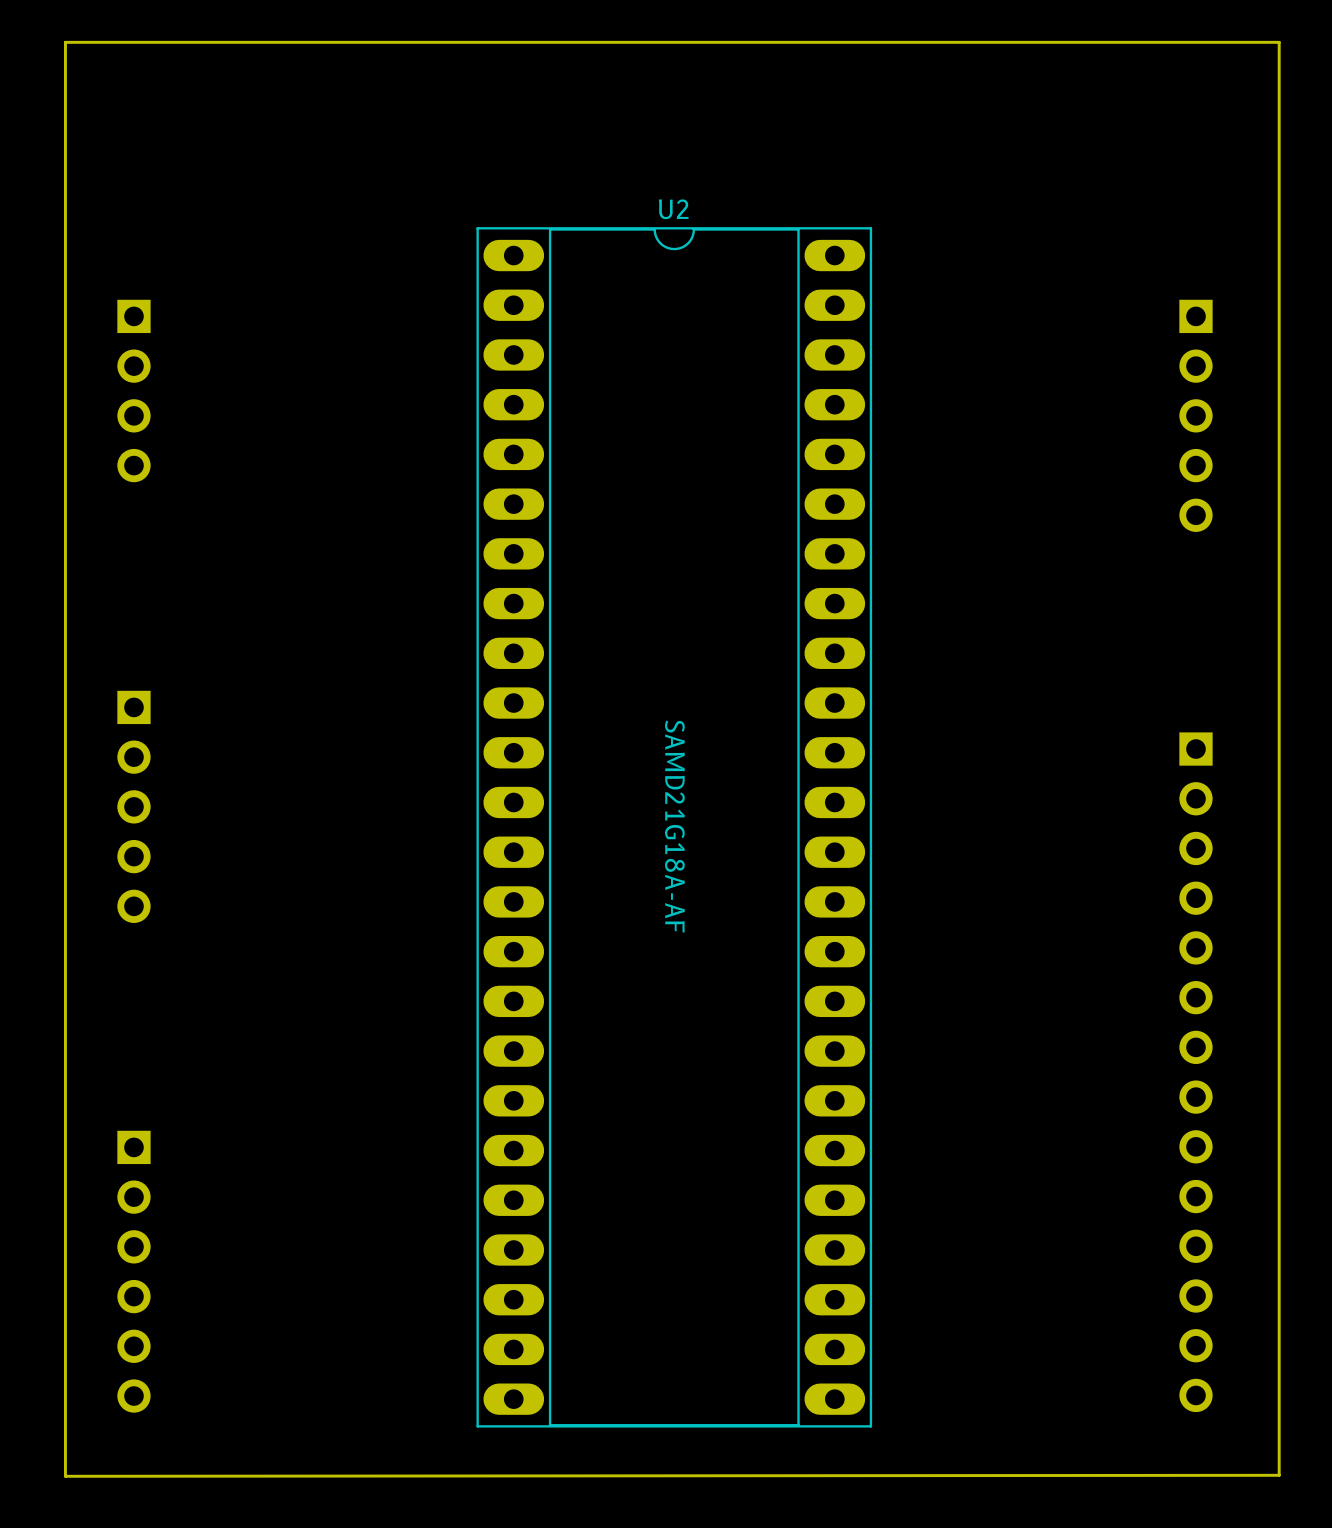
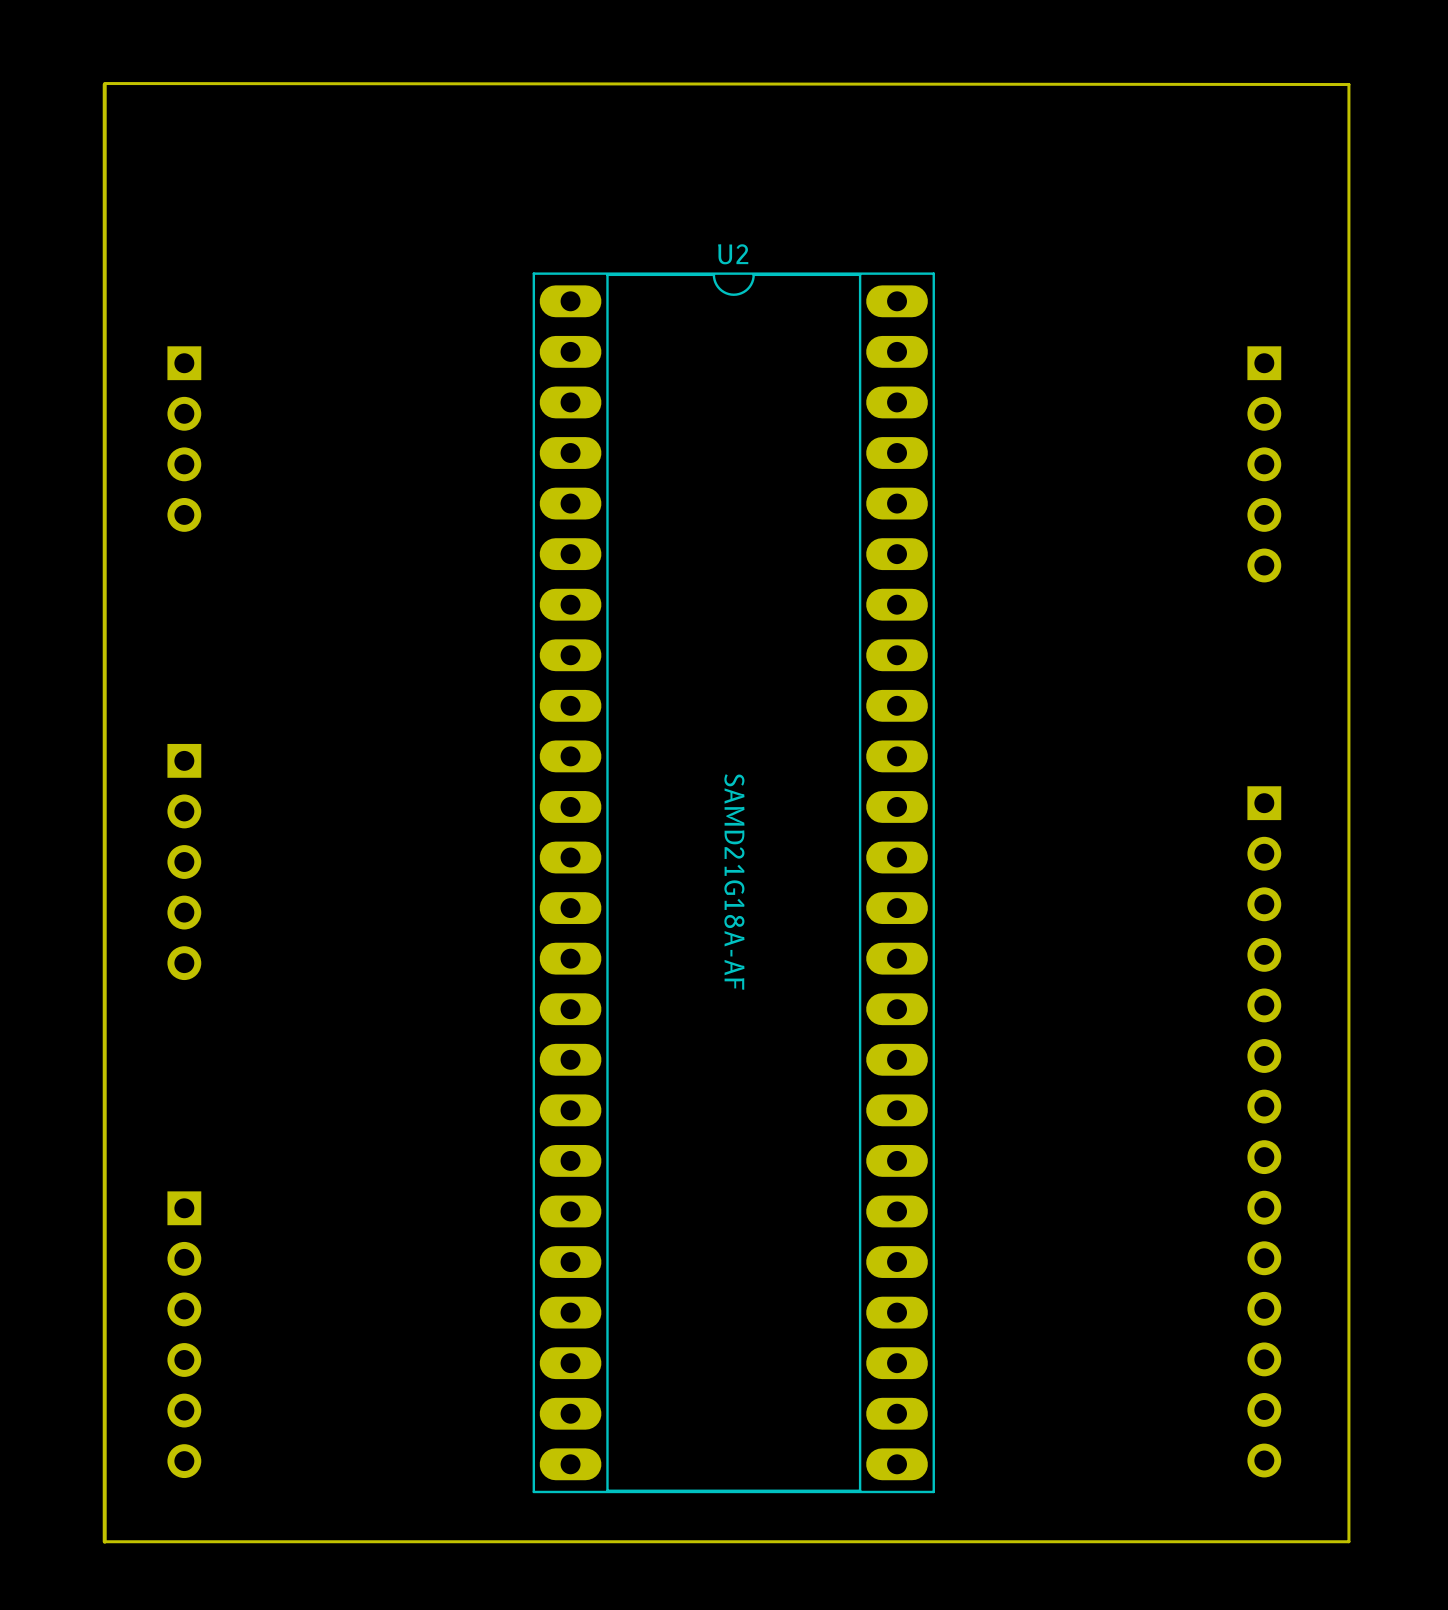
board edge: none -> (104, 83) (1348, 84)
board edge: (1279, 42) (65, 42) (65, 1476) (1279, 1475) -> (104, 84) (104, 1541) (1348, 1541)

